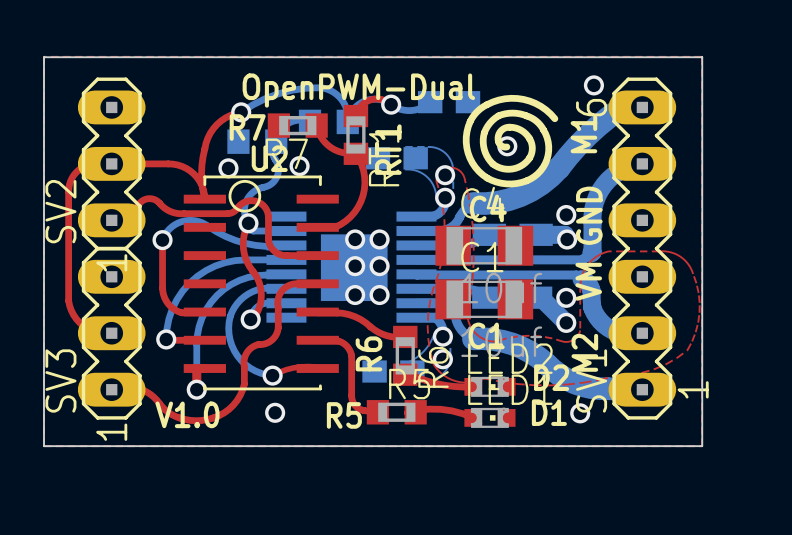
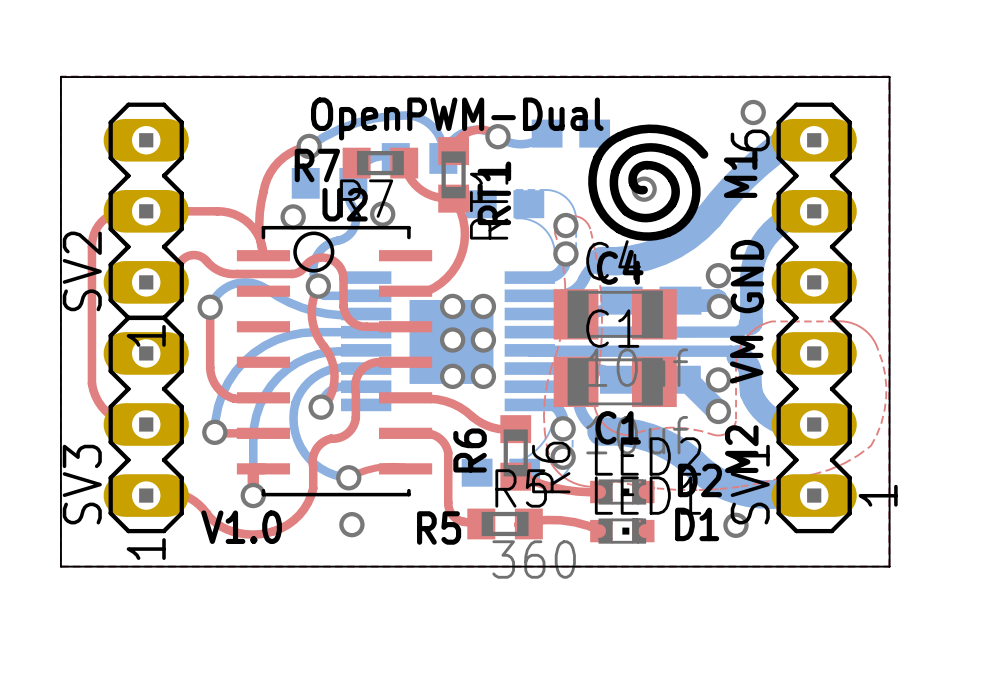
R5 value: none -> 360 (534, 559)

